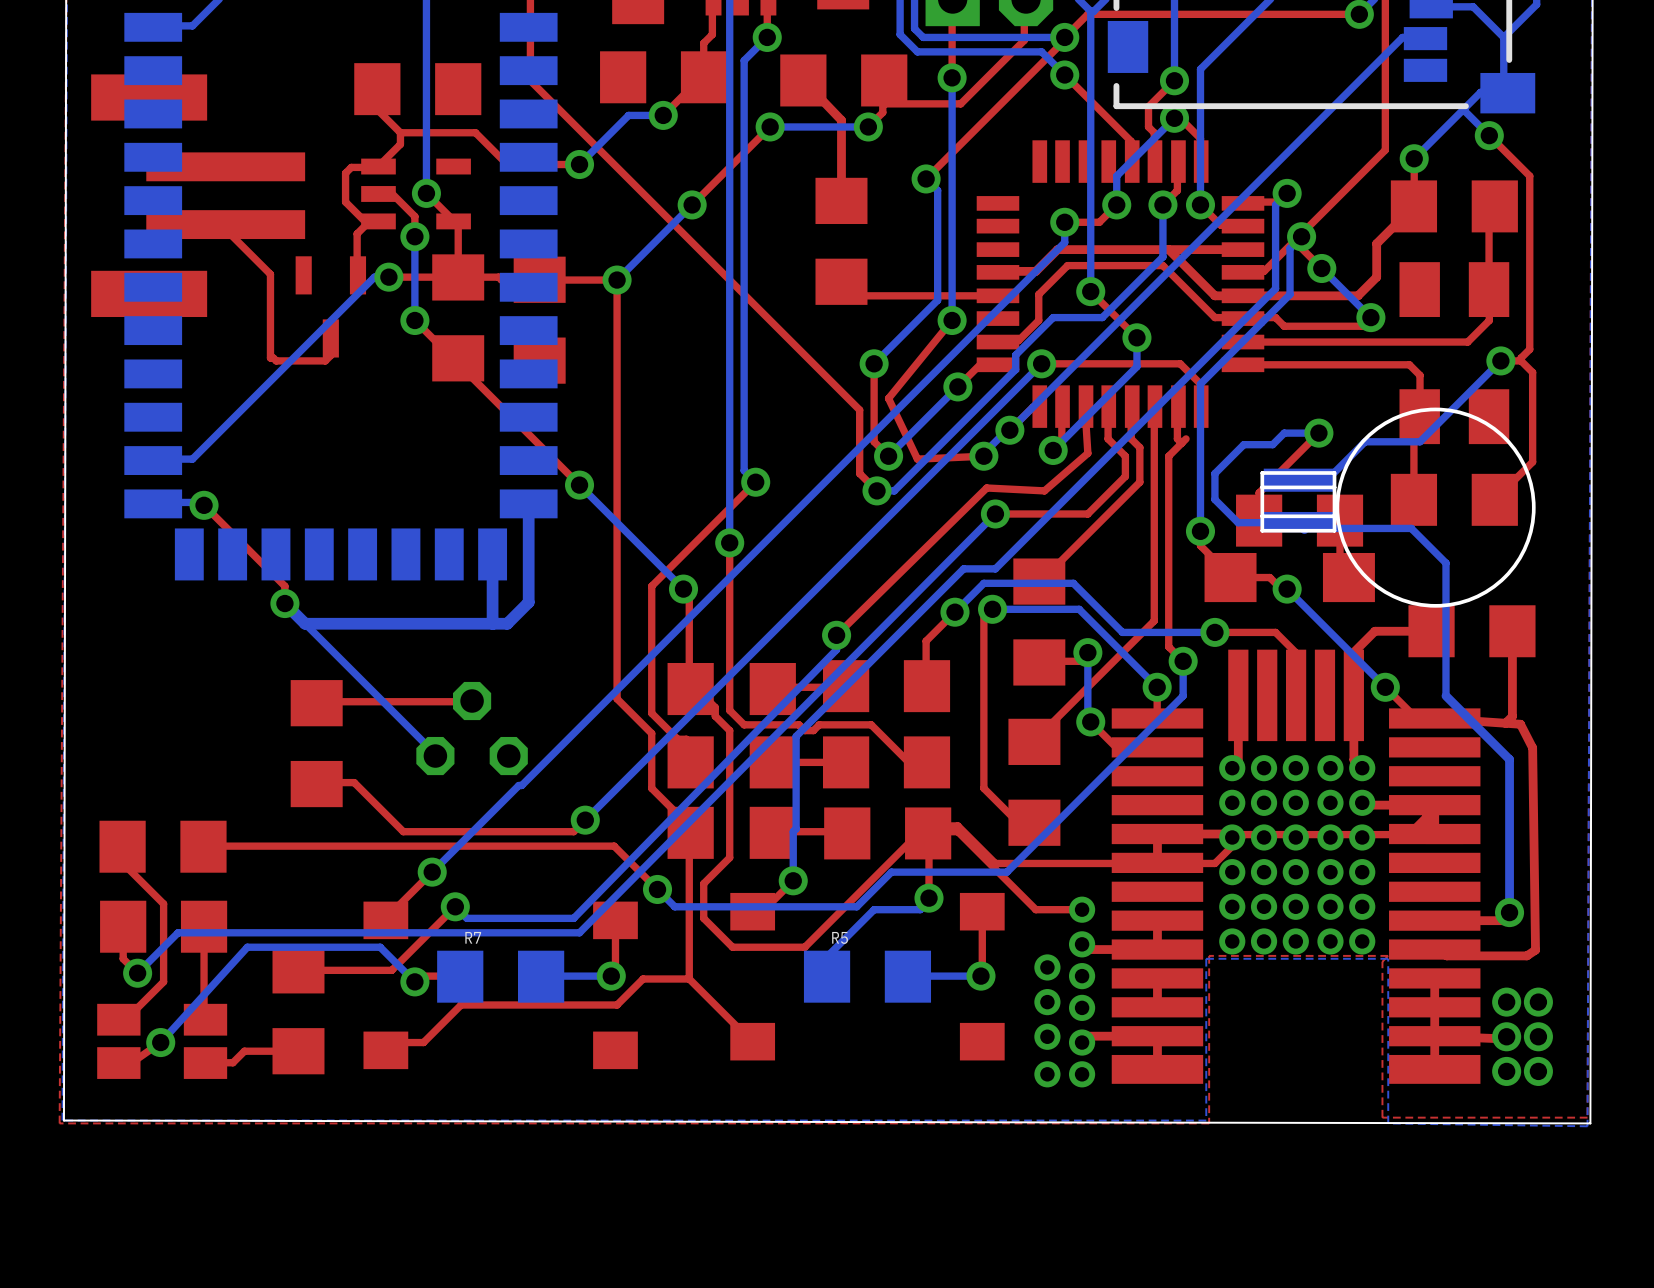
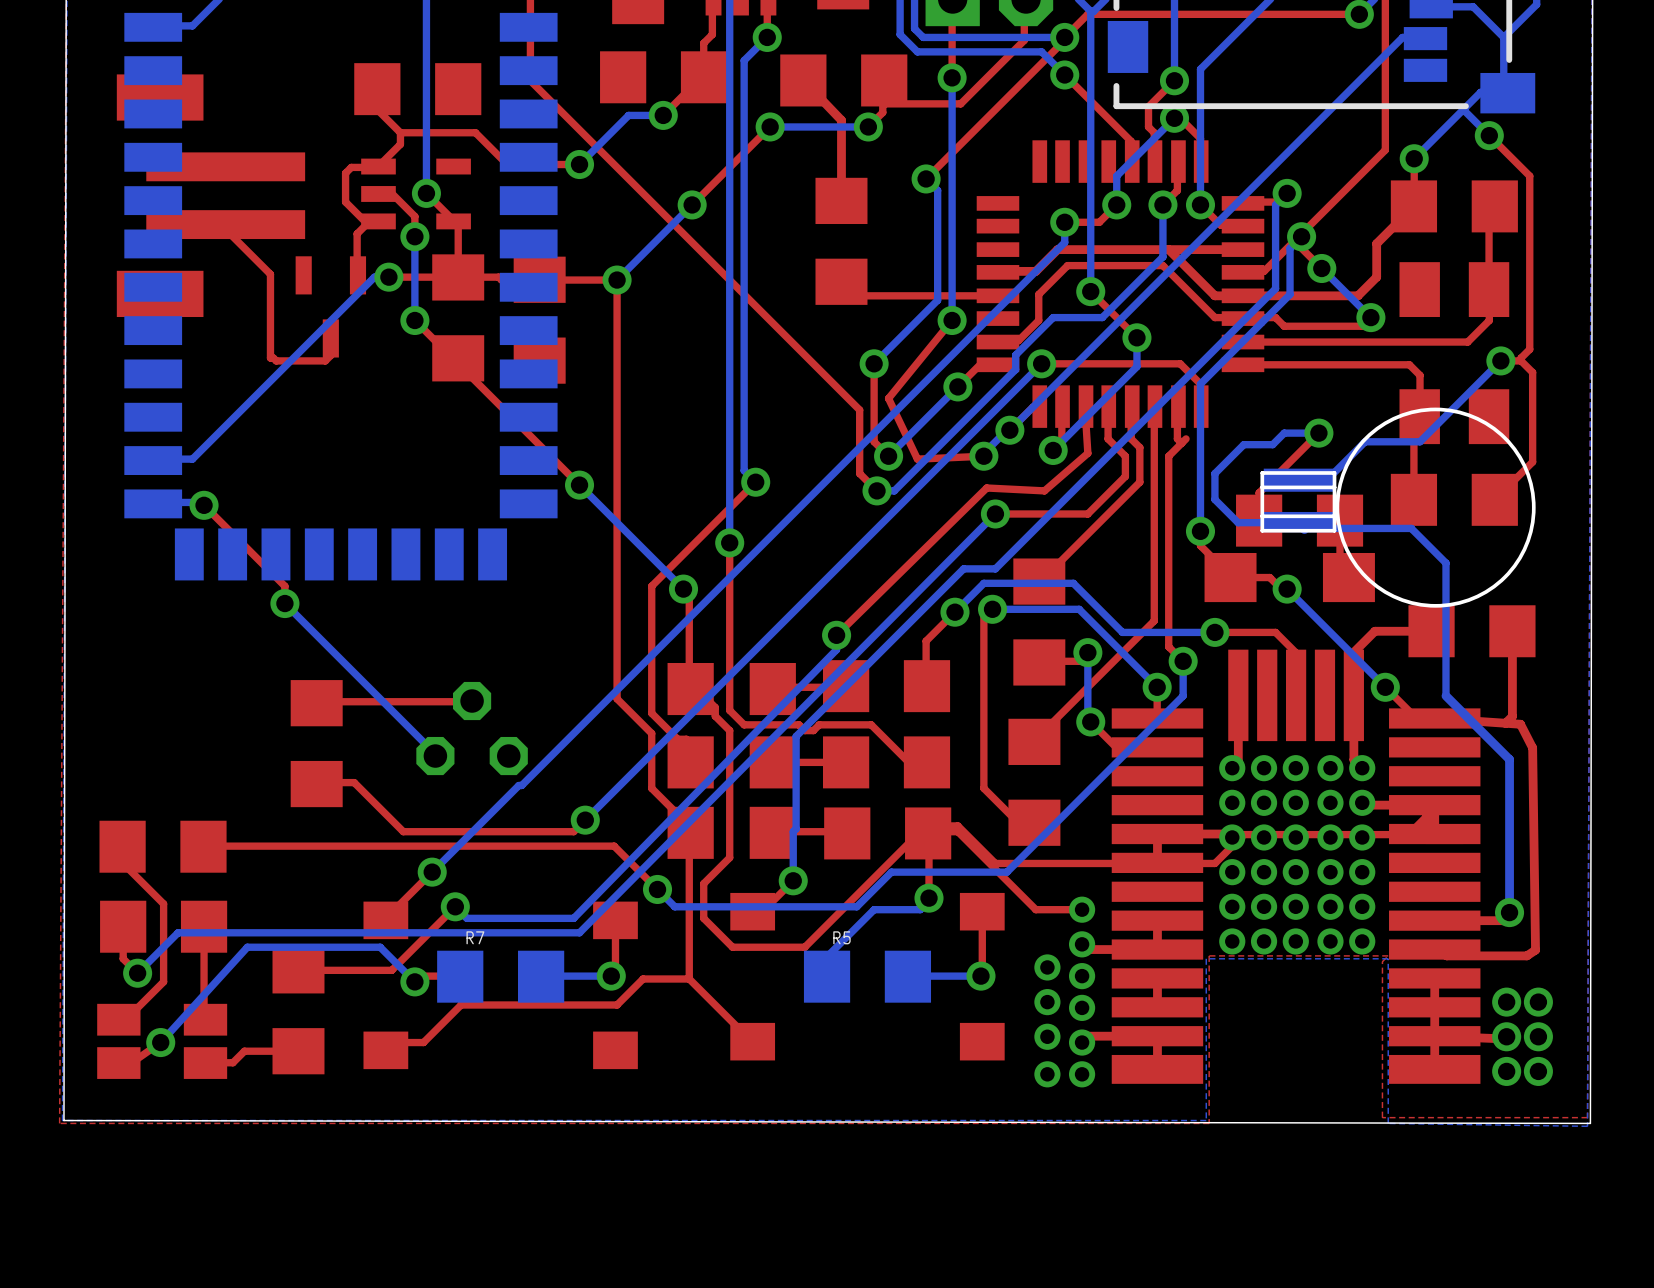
part footprint: [91, 74, 306, 318] -> [116, 74, 306, 318]
bottom track: (528, 503) (528, 602) (507, 623) (305, 623) (284, 603) -> none
bottom track: (492, 554) (492, 623) -> none

